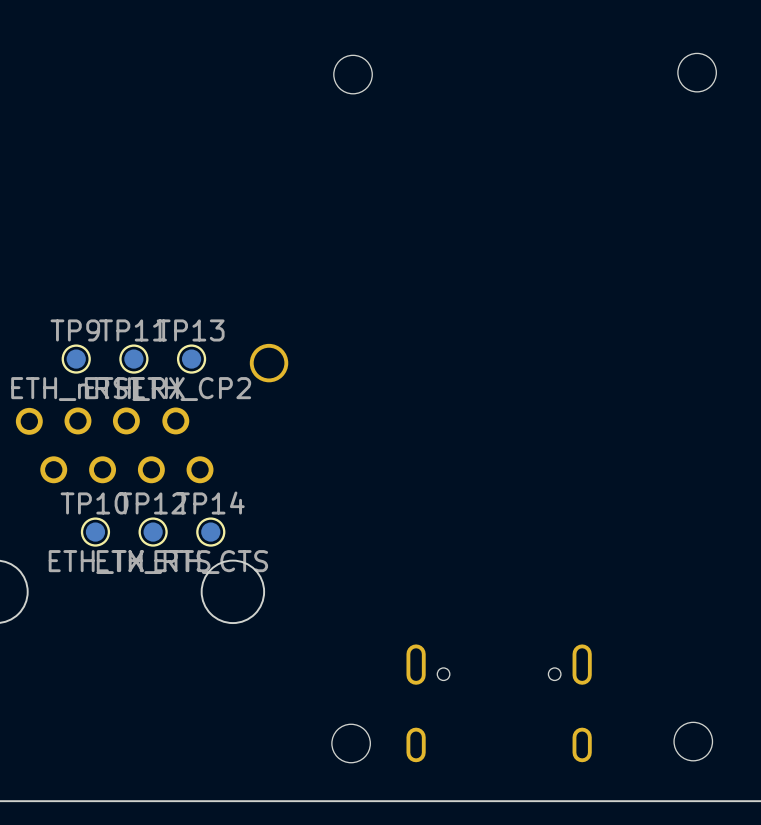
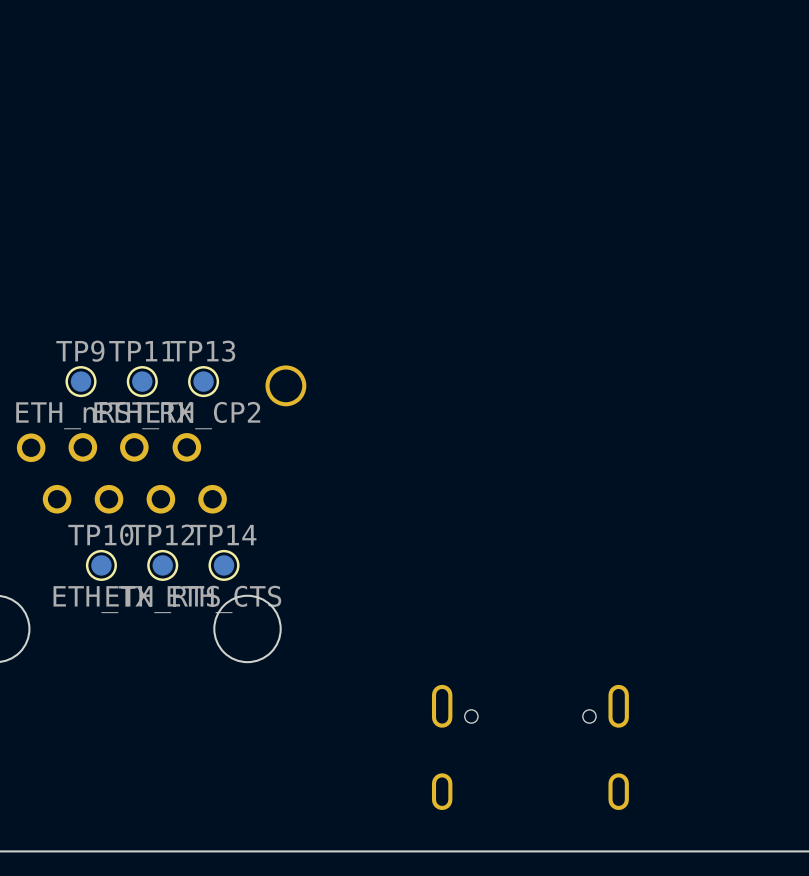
drawing: [331, 52, 717, 764] -> none

